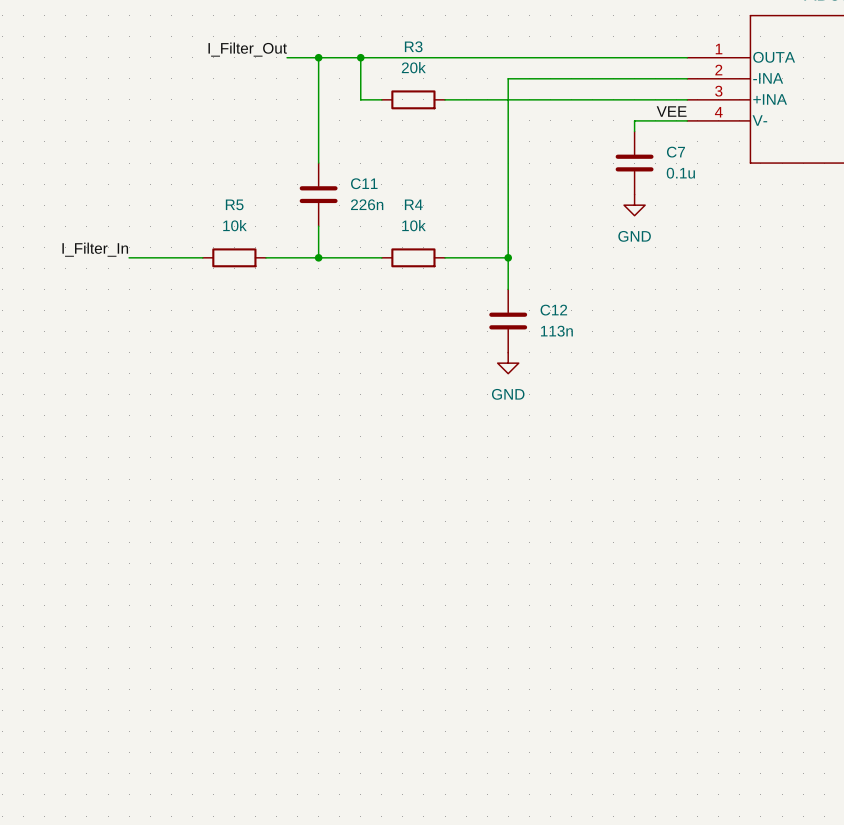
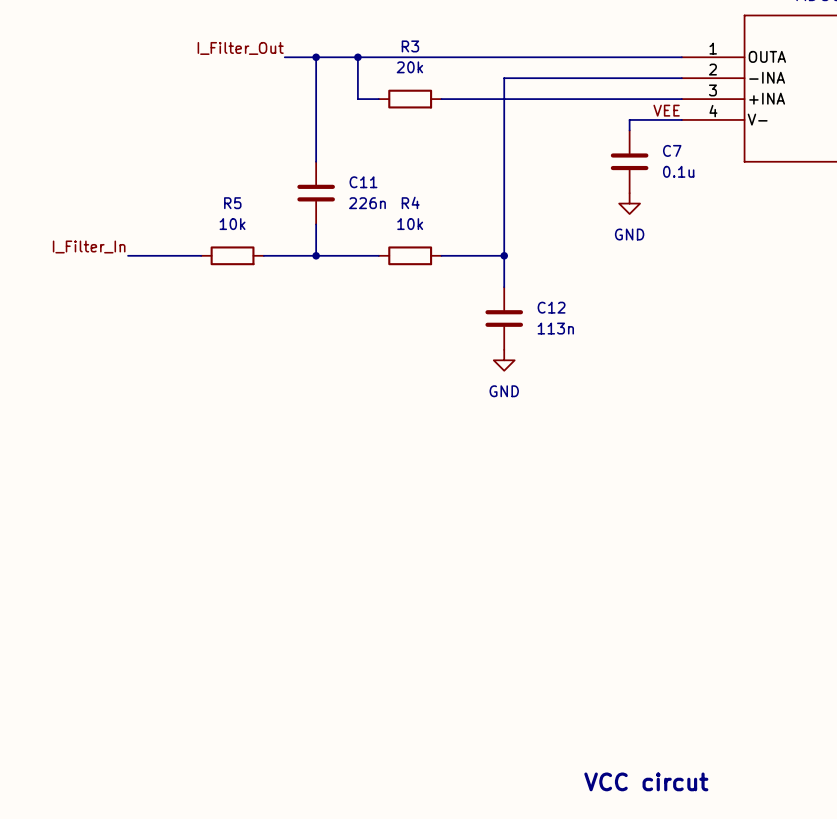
text: none -> VCC circut (646, 781)

